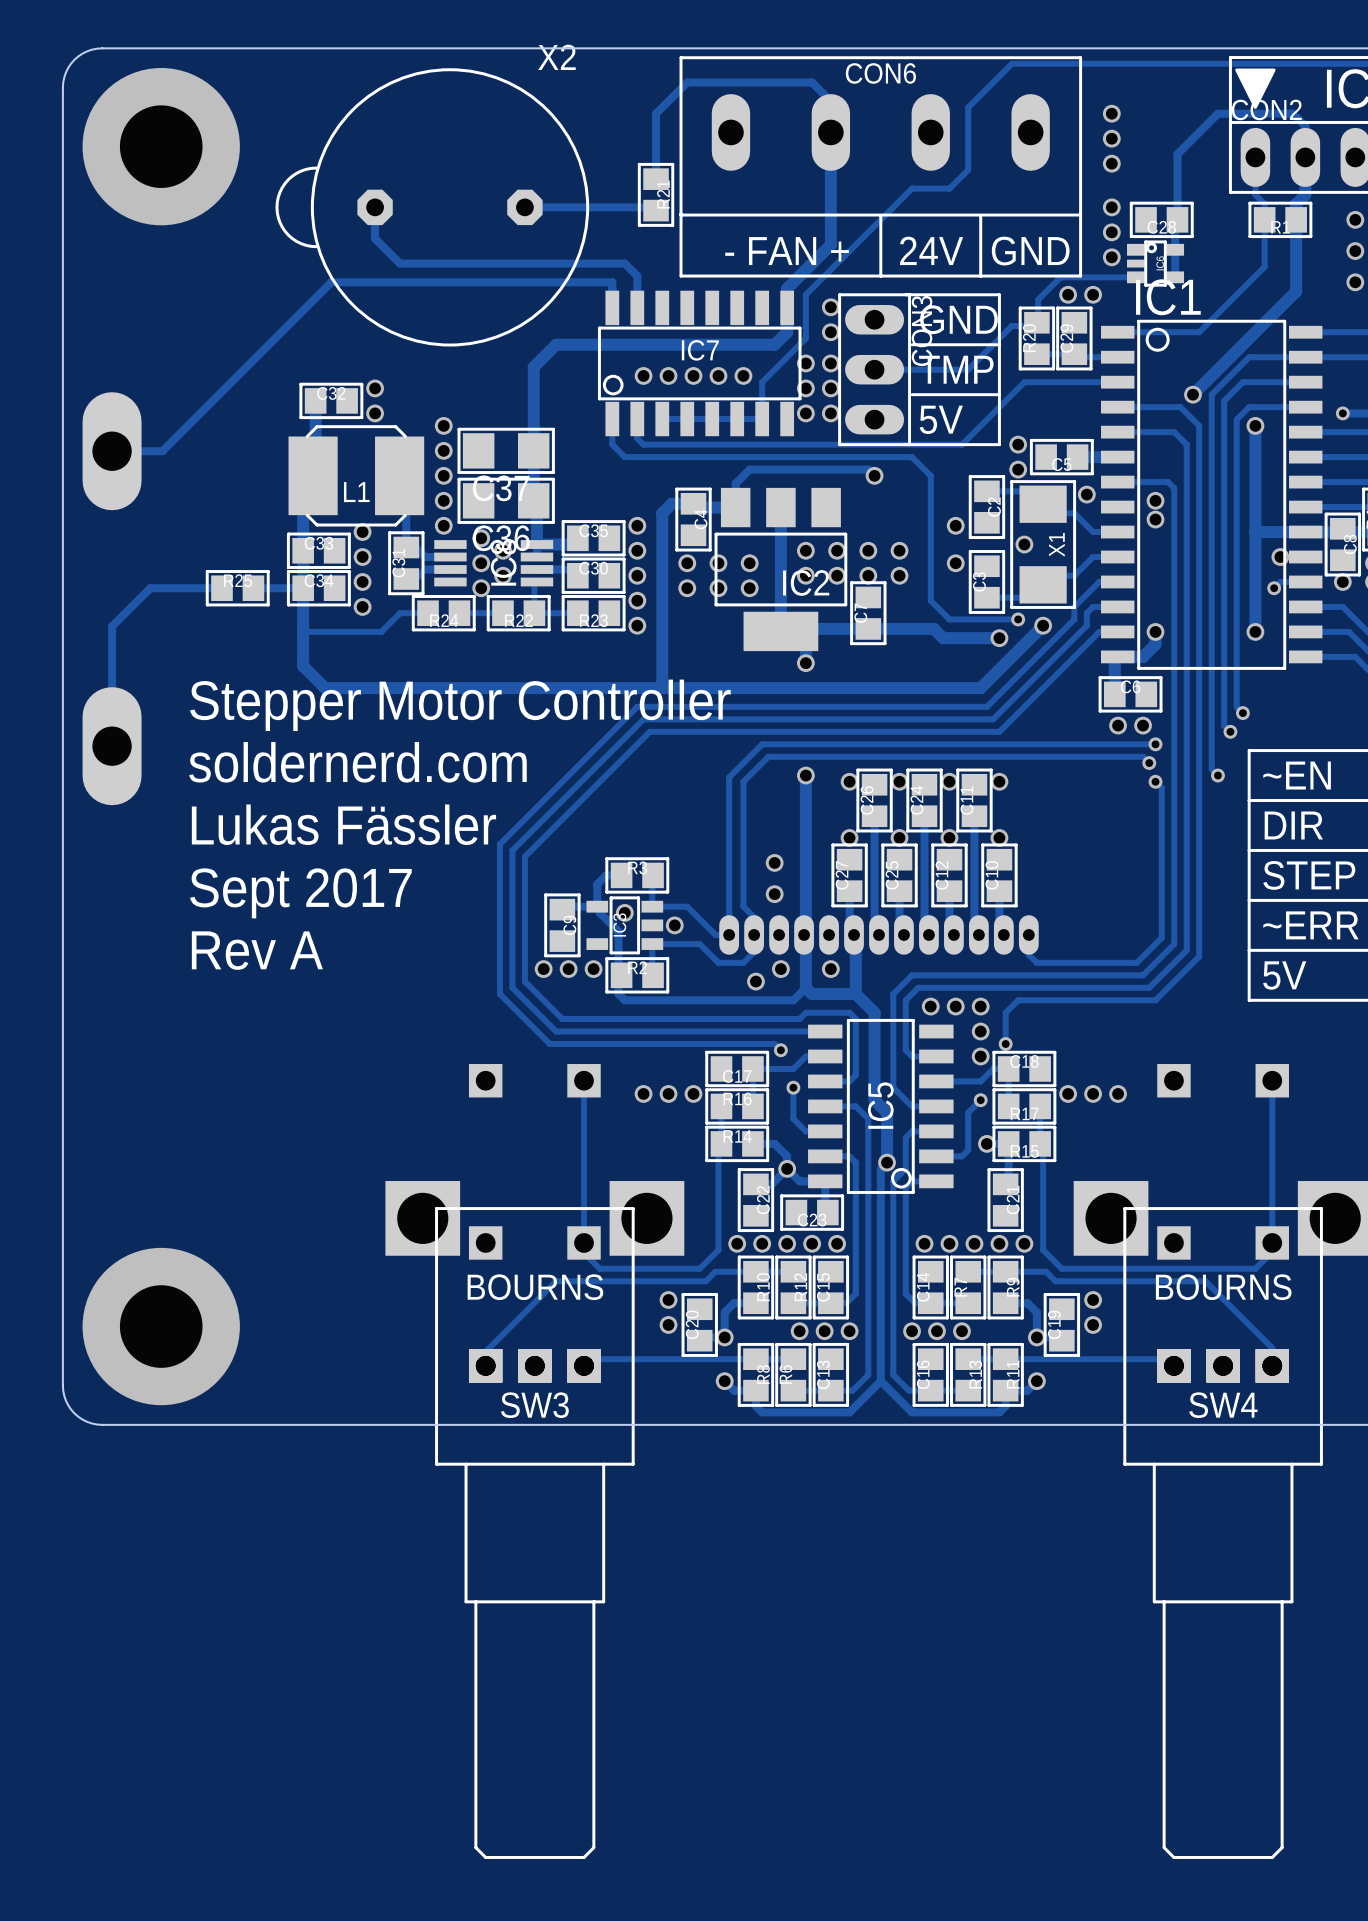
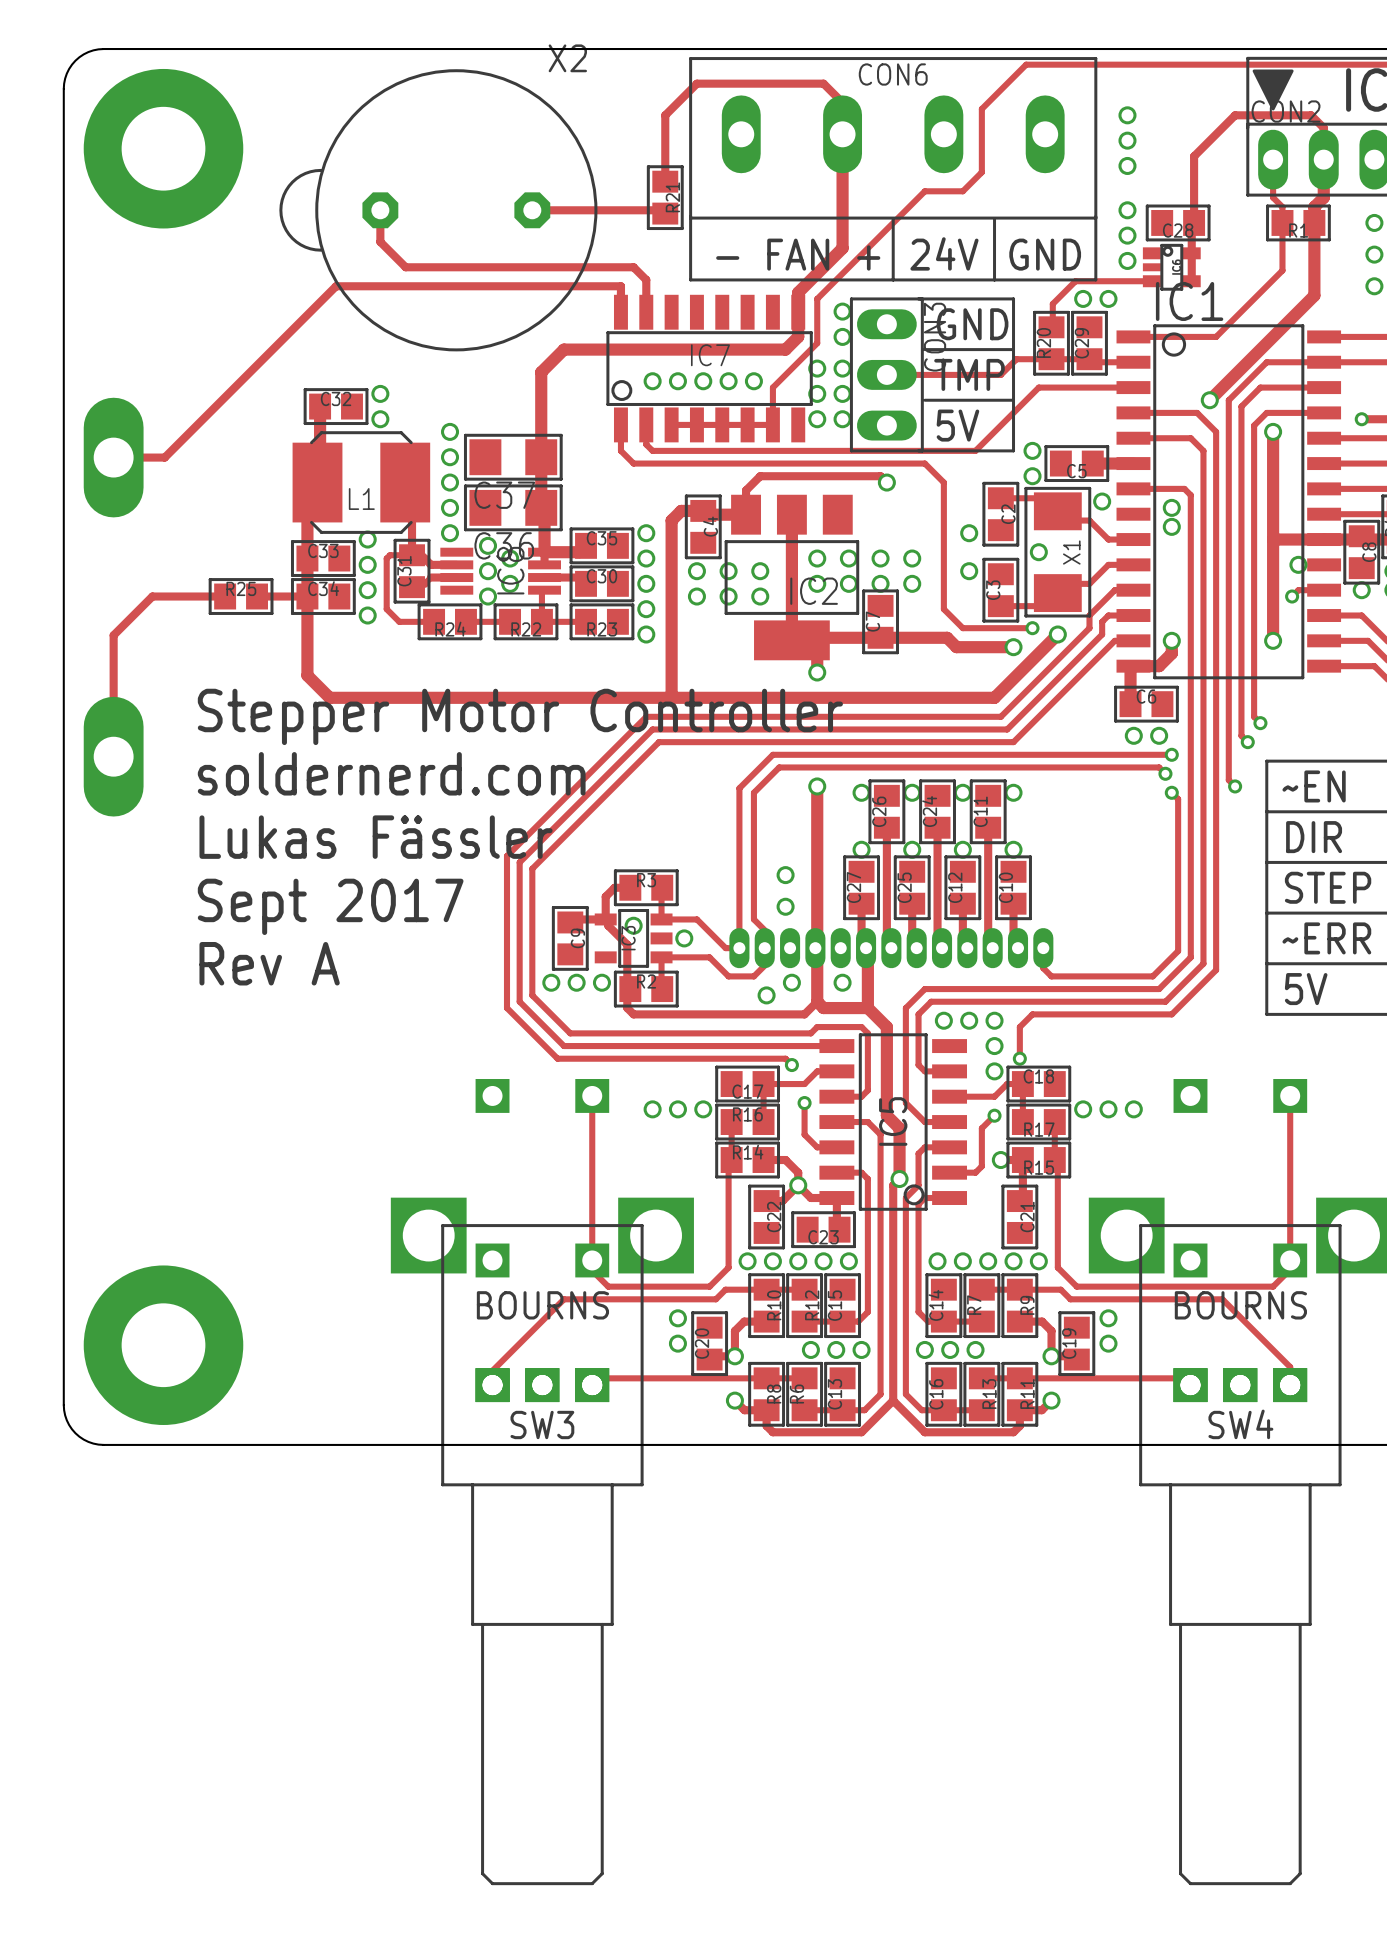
track: (1036, 322) (1033, 326) (1011, 326) (968, 369) -> (1051, 359) (1016, 359) (1000, 374) (981, 374)
track: (400, 613) (381, 631) (303, 631) -> (405, 621) (399, 621) (386, 609) (386, 558) (389, 555) (412, 555)

